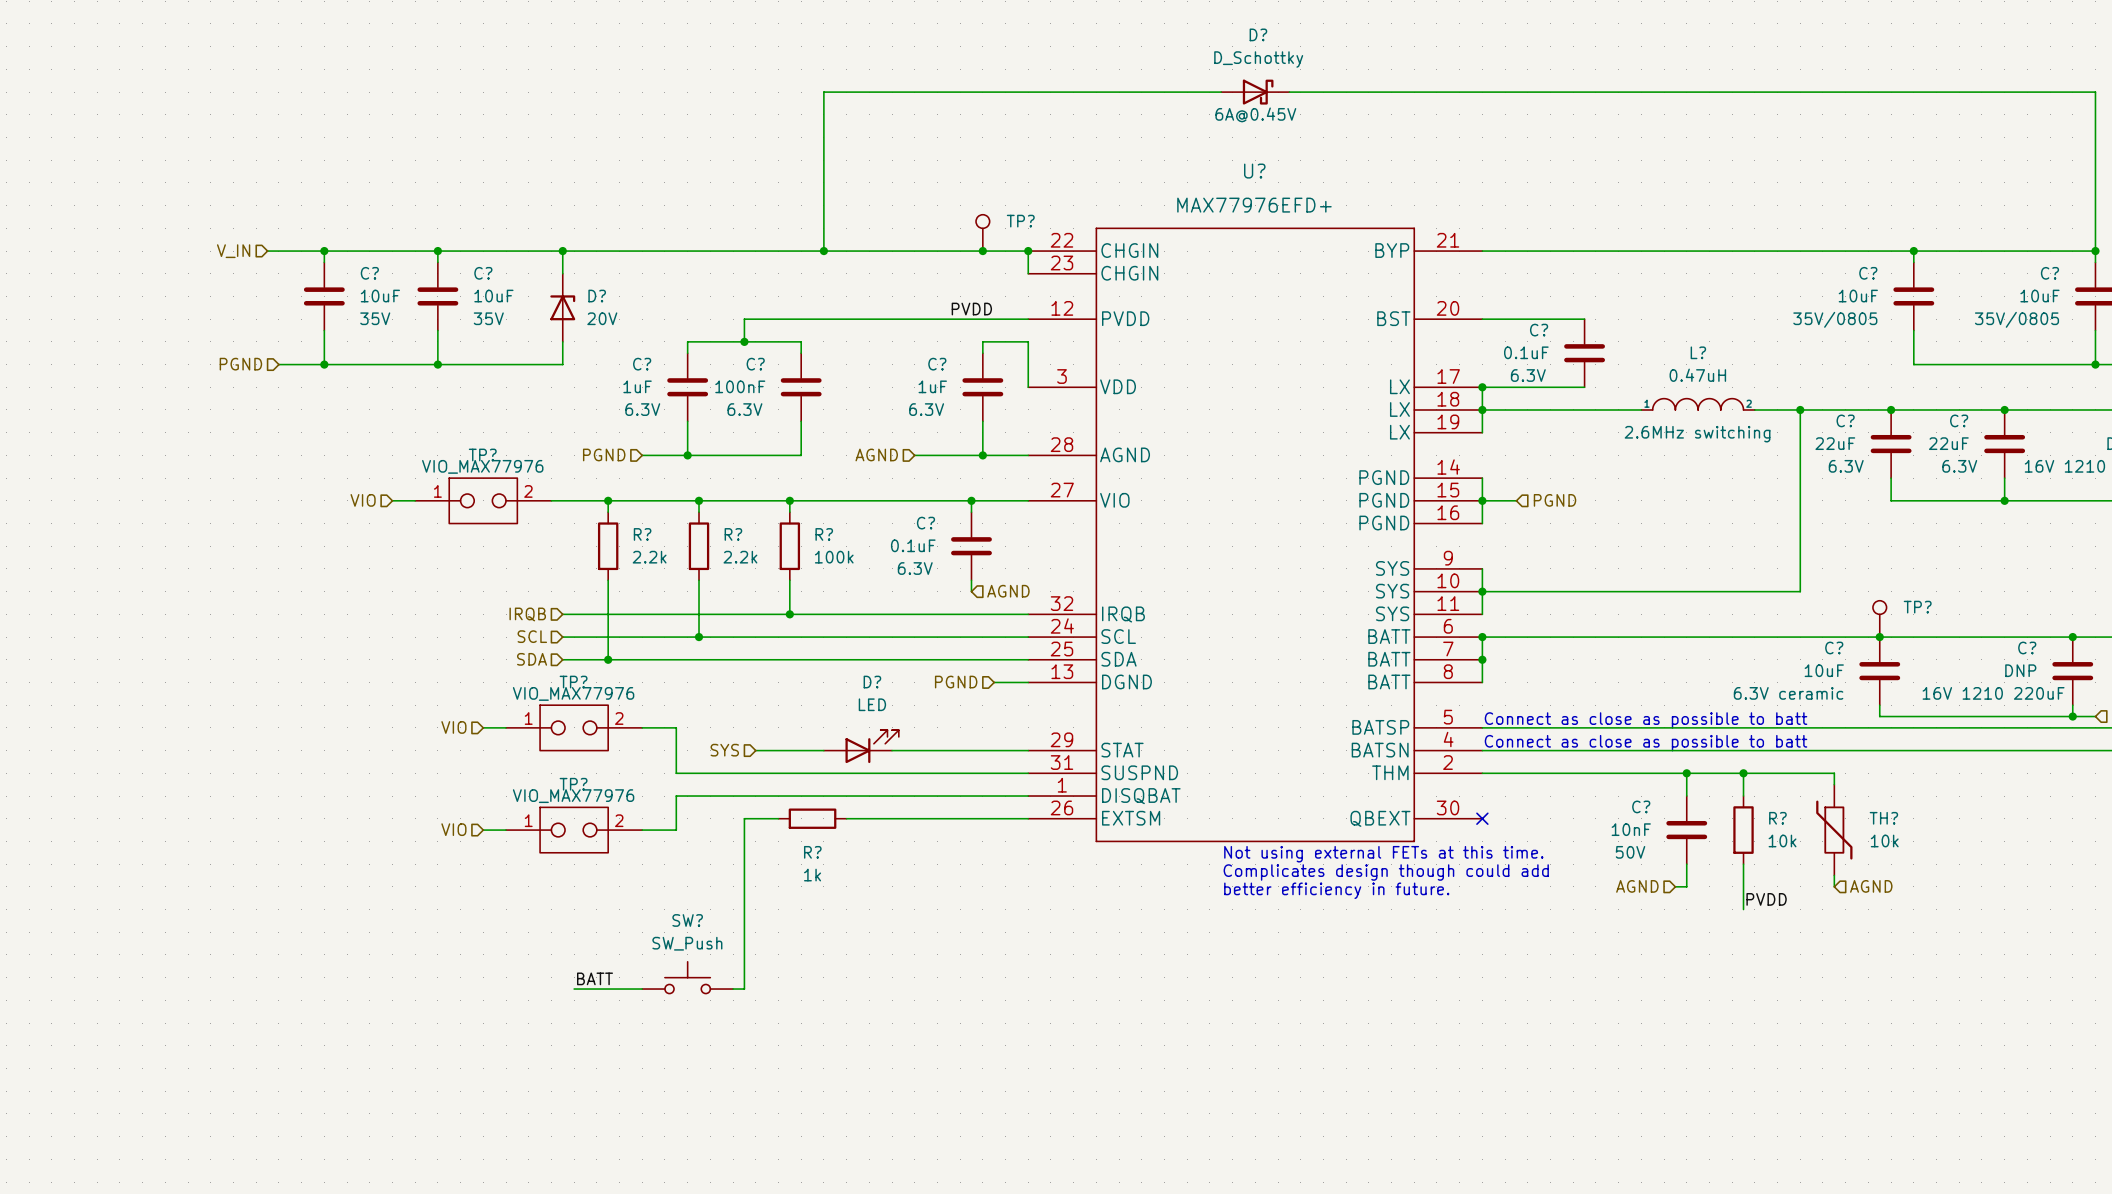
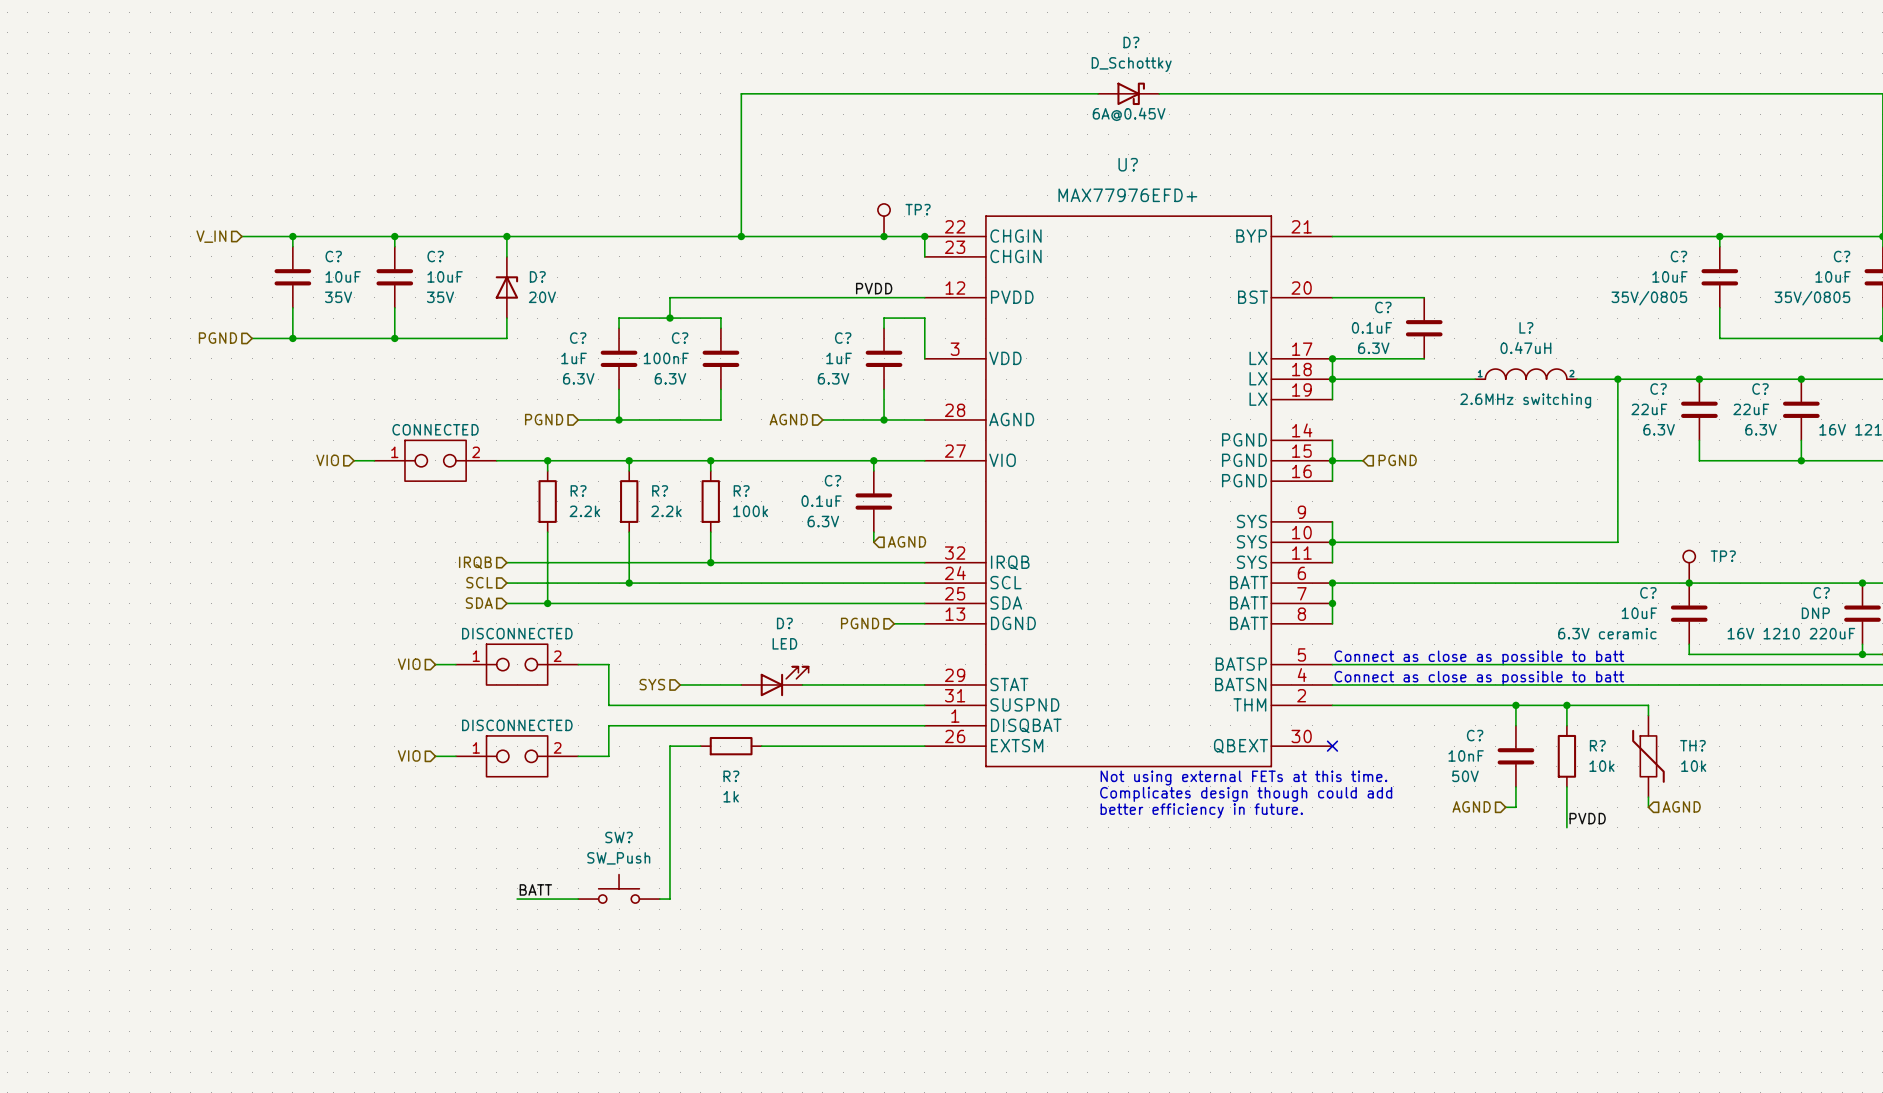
TP? name: TP? (482, 454) -> none
TP? value: VIO_MAX77976 (482, 466) -> CONNECTED (435, 429)
TP? name: TP? (573, 682) -> none
TP? value: VIO_MAX77976 (573, 693) -> DISCONNECTED (517, 633)
TP? name: TP? (573, 784) -> none
TP? value: VIO_MAX77976 (573, 796) -> DISCONNECTED (517, 725)

